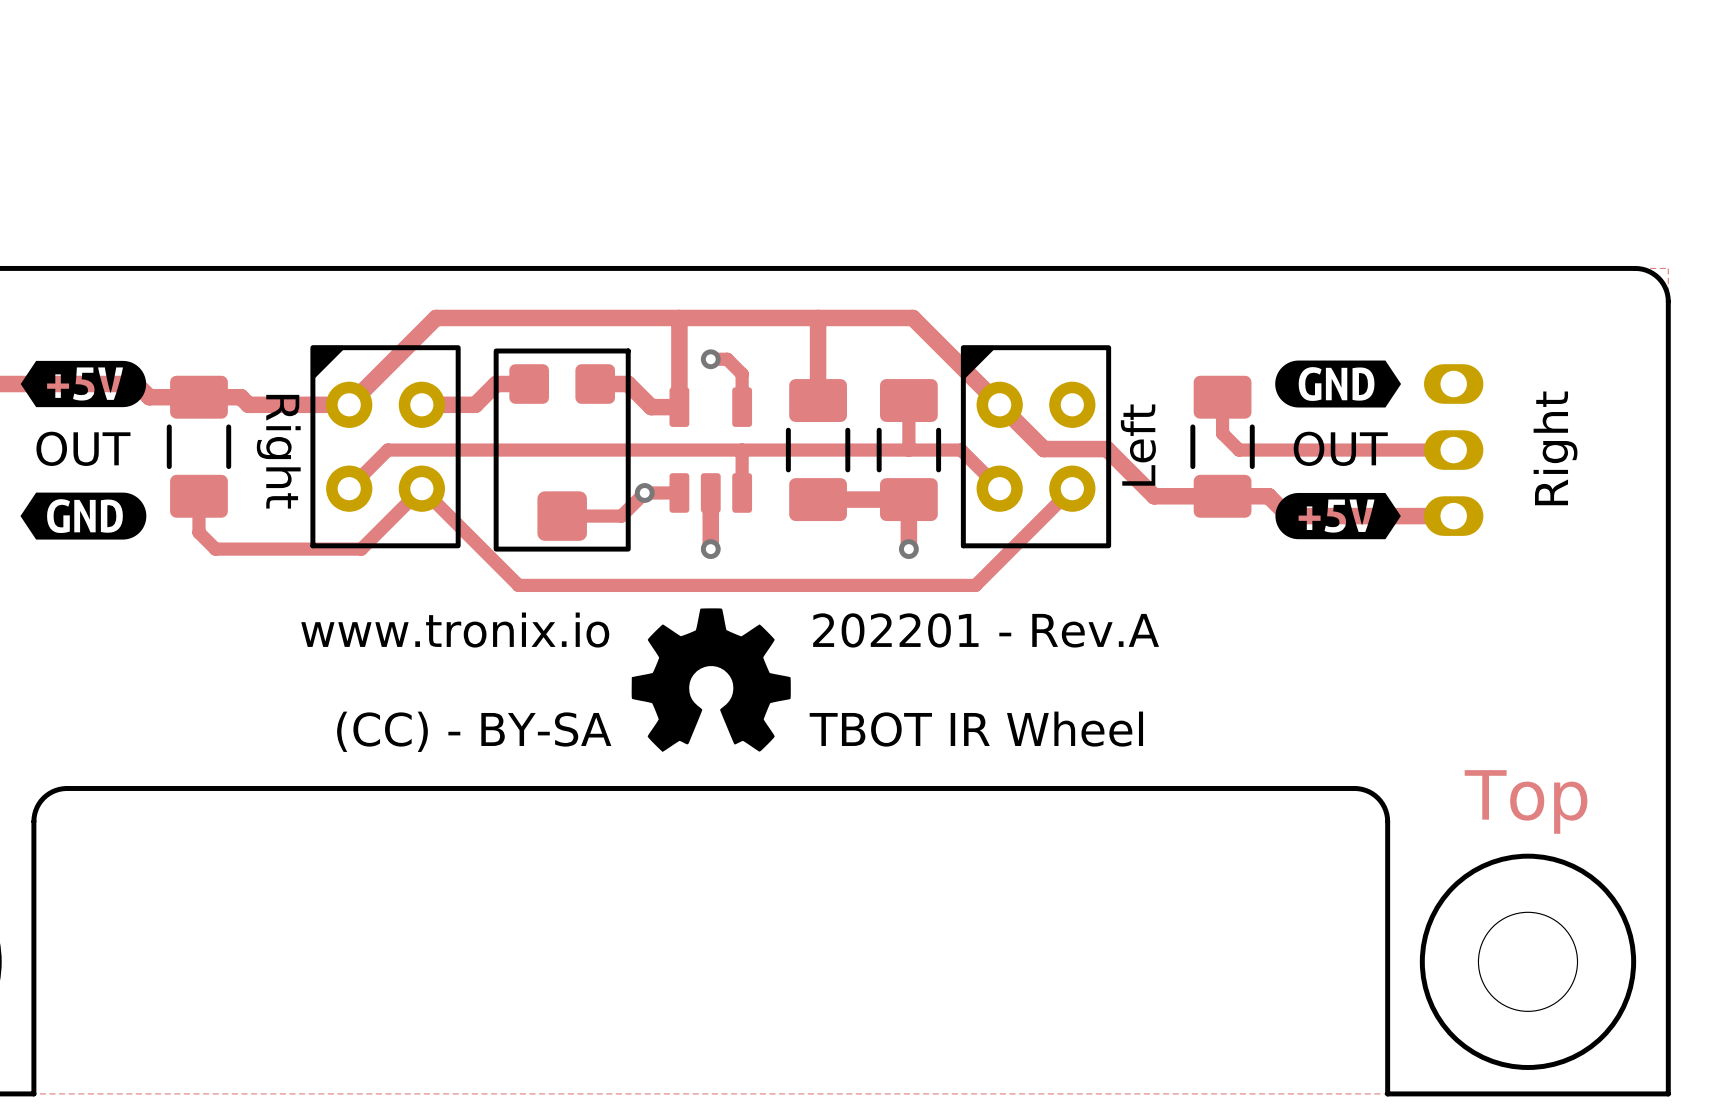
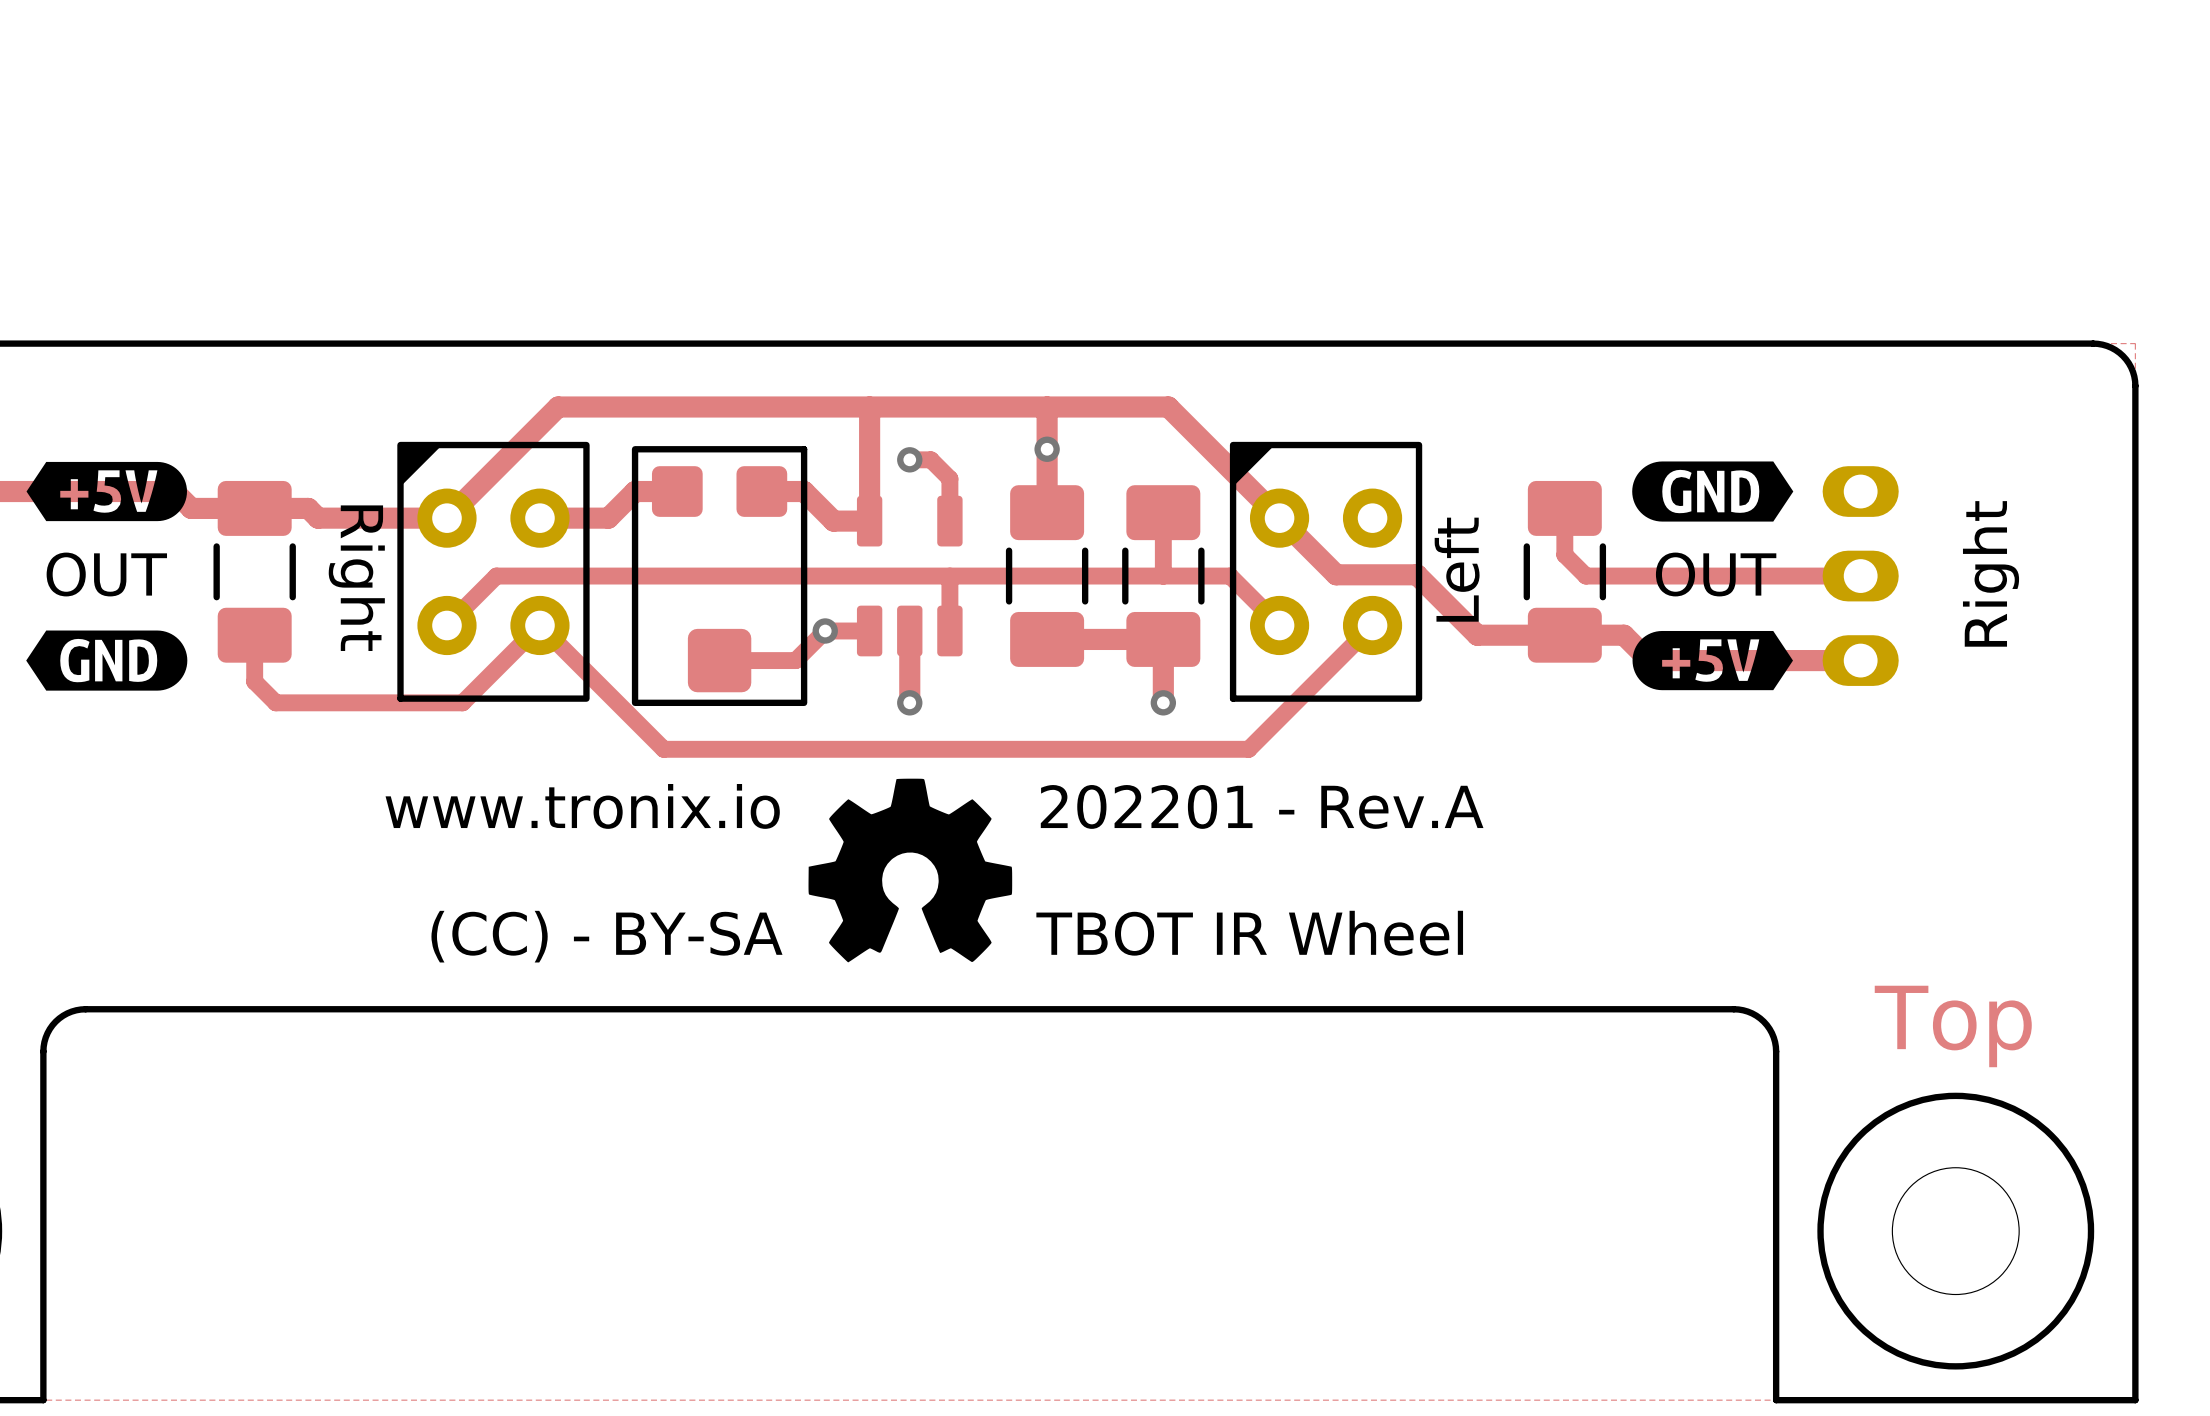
via: none -> (1047, 449)

